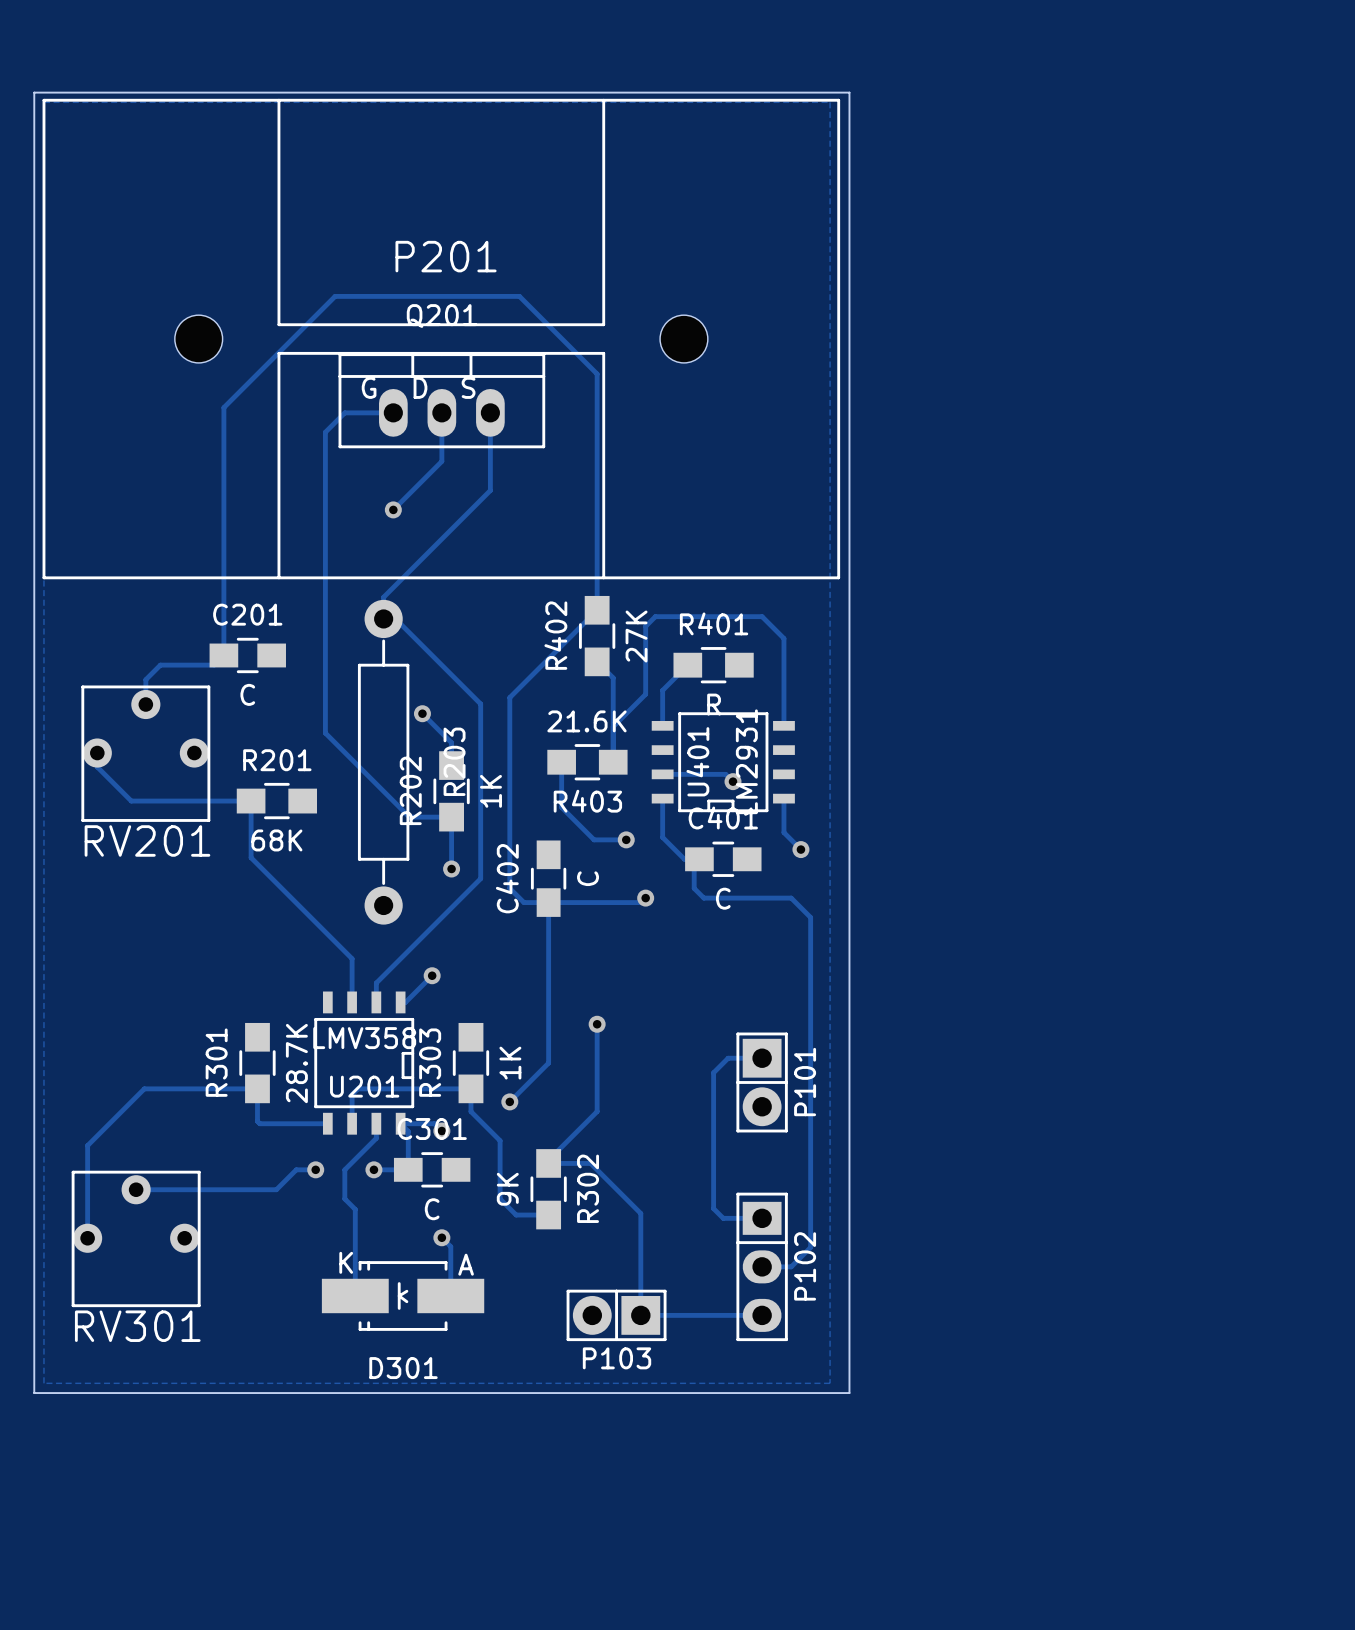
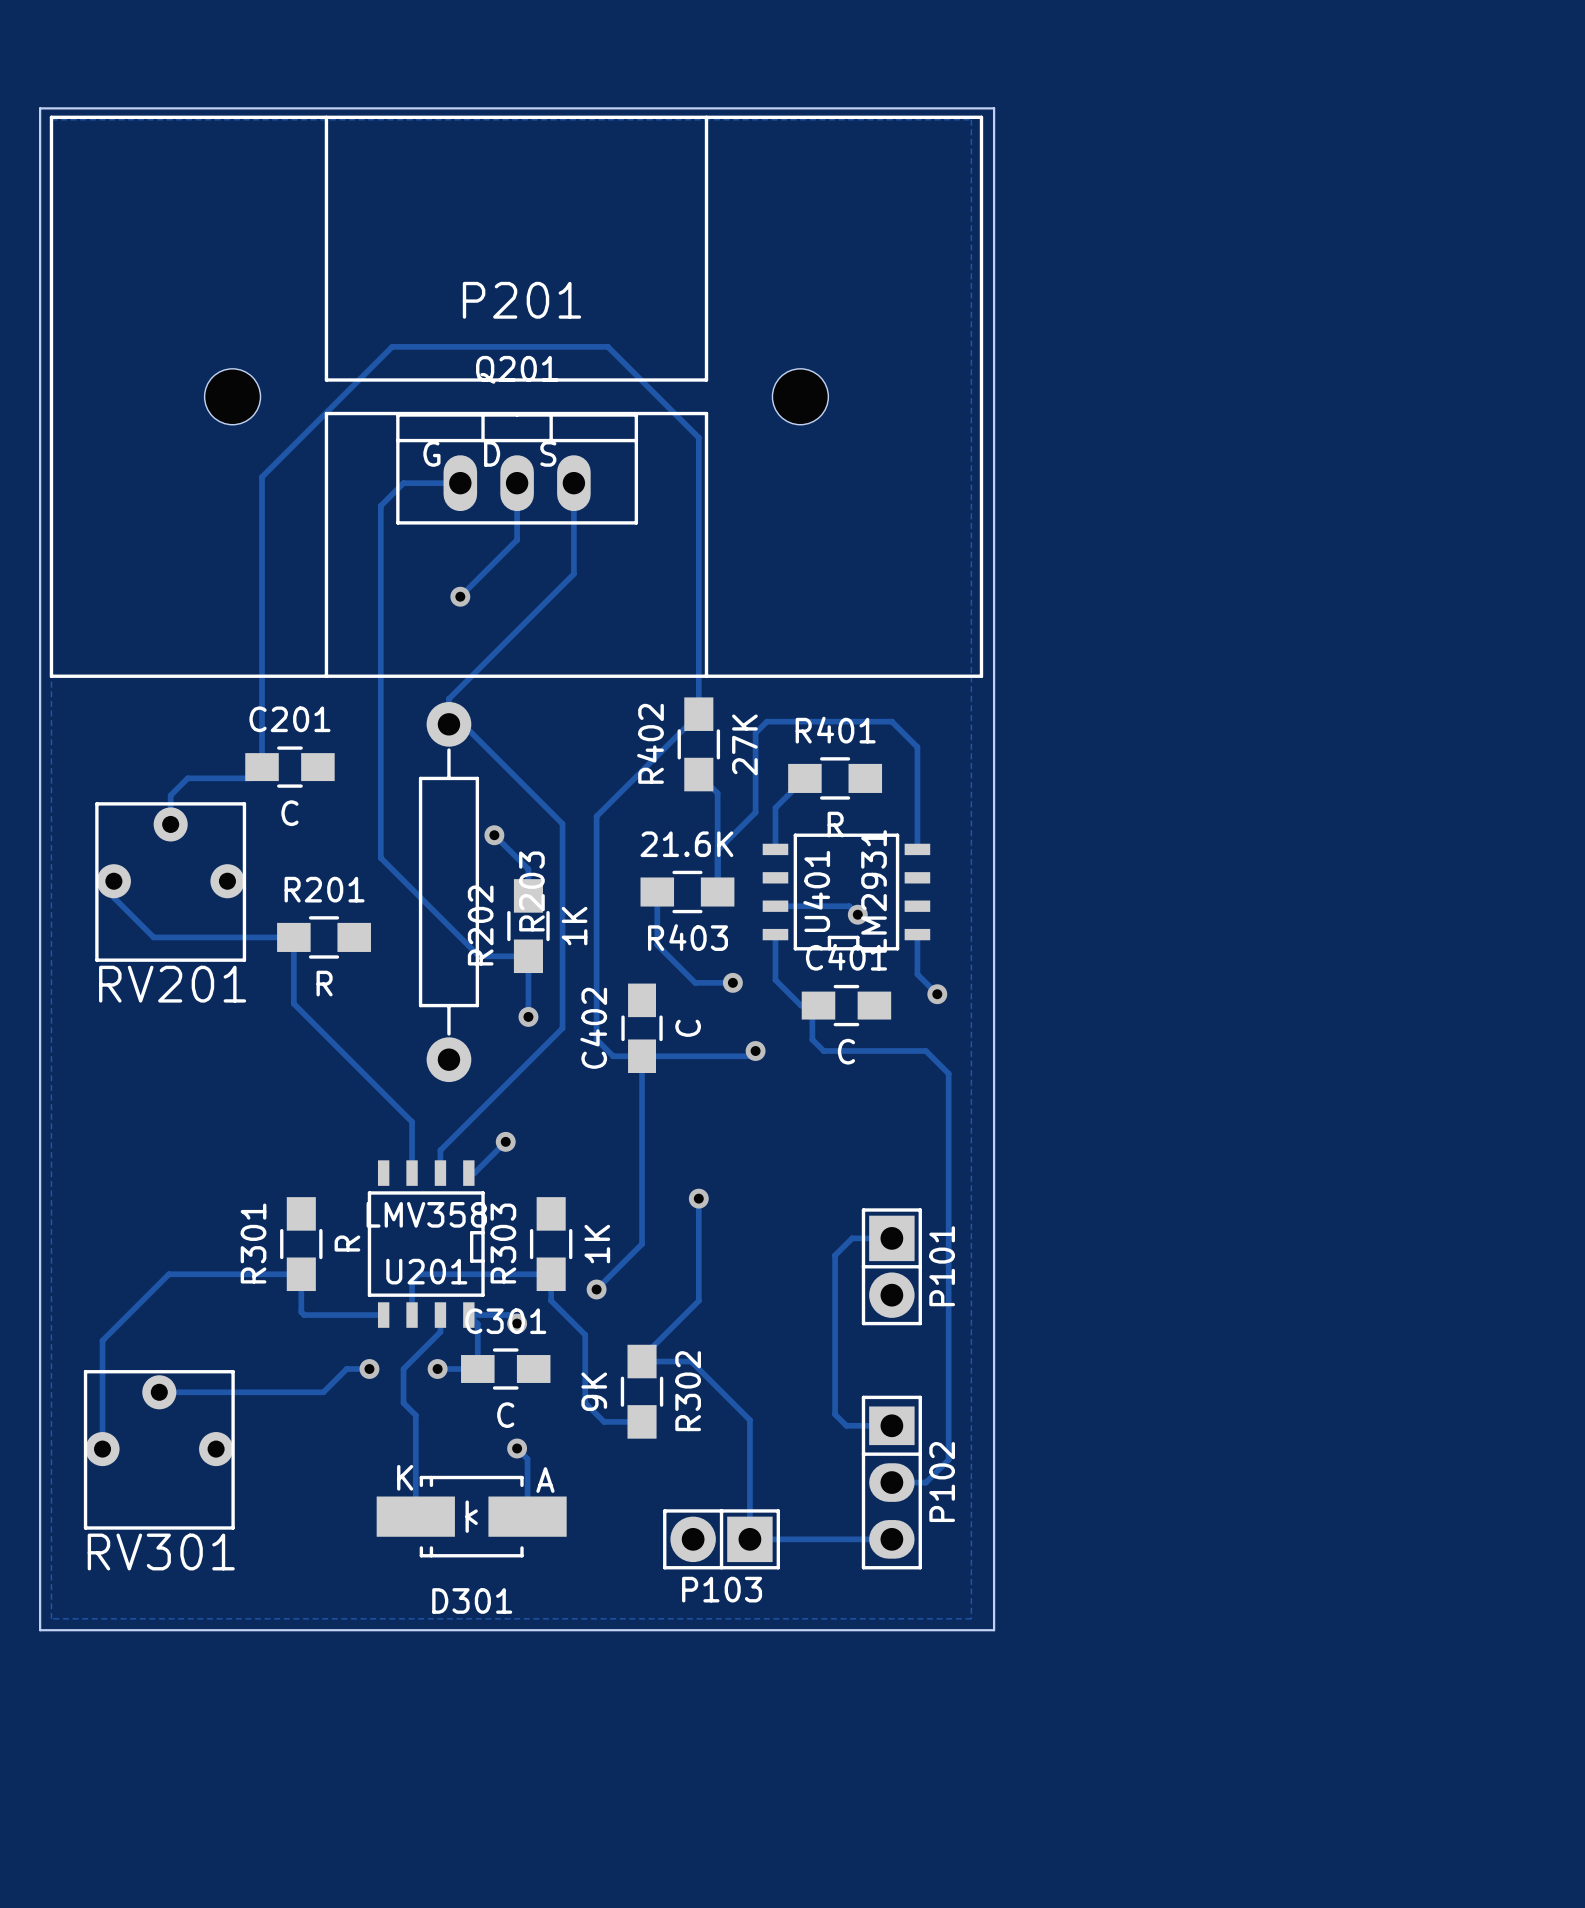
R201 value: 68K (276, 840) -> R (324, 983)
R301 value: 28.7K (296, 1063) -> R (347, 1243)

